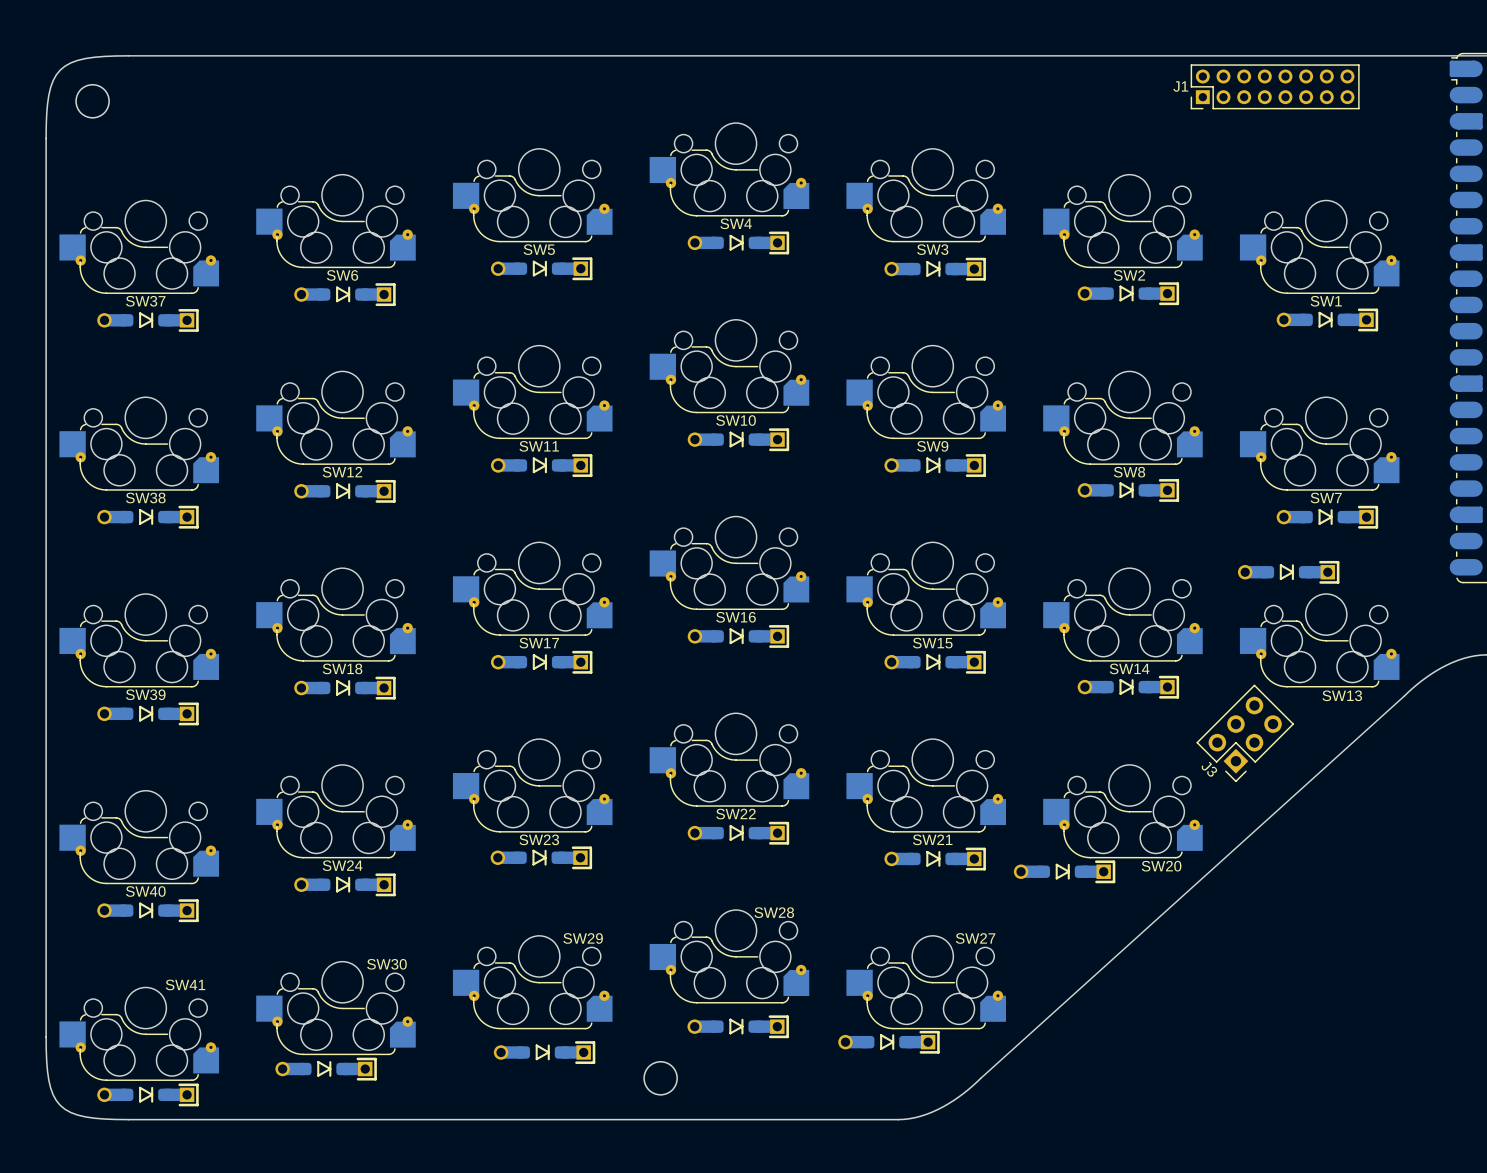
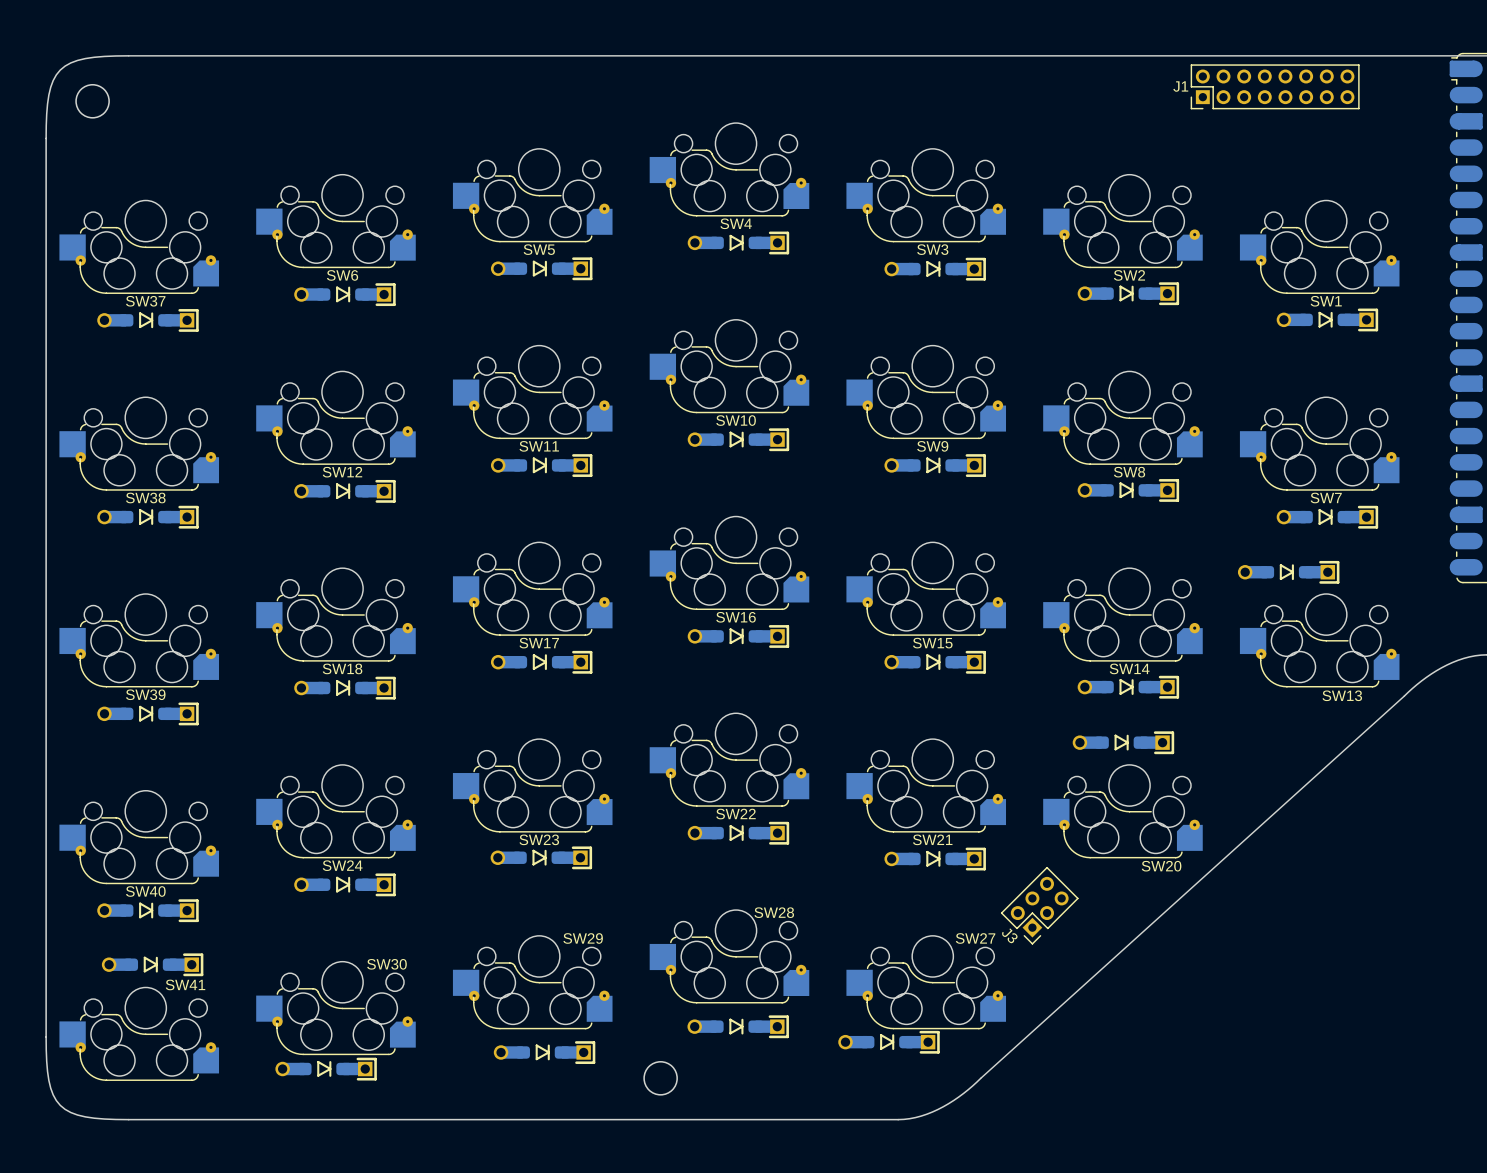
J3 footprint: [1196, 684, 1294, 782] -> [1000, 867, 1079, 945]
part position: (1064, 871) -> (1123, 742)
part position: (147, 1094) -> (152, 964)

